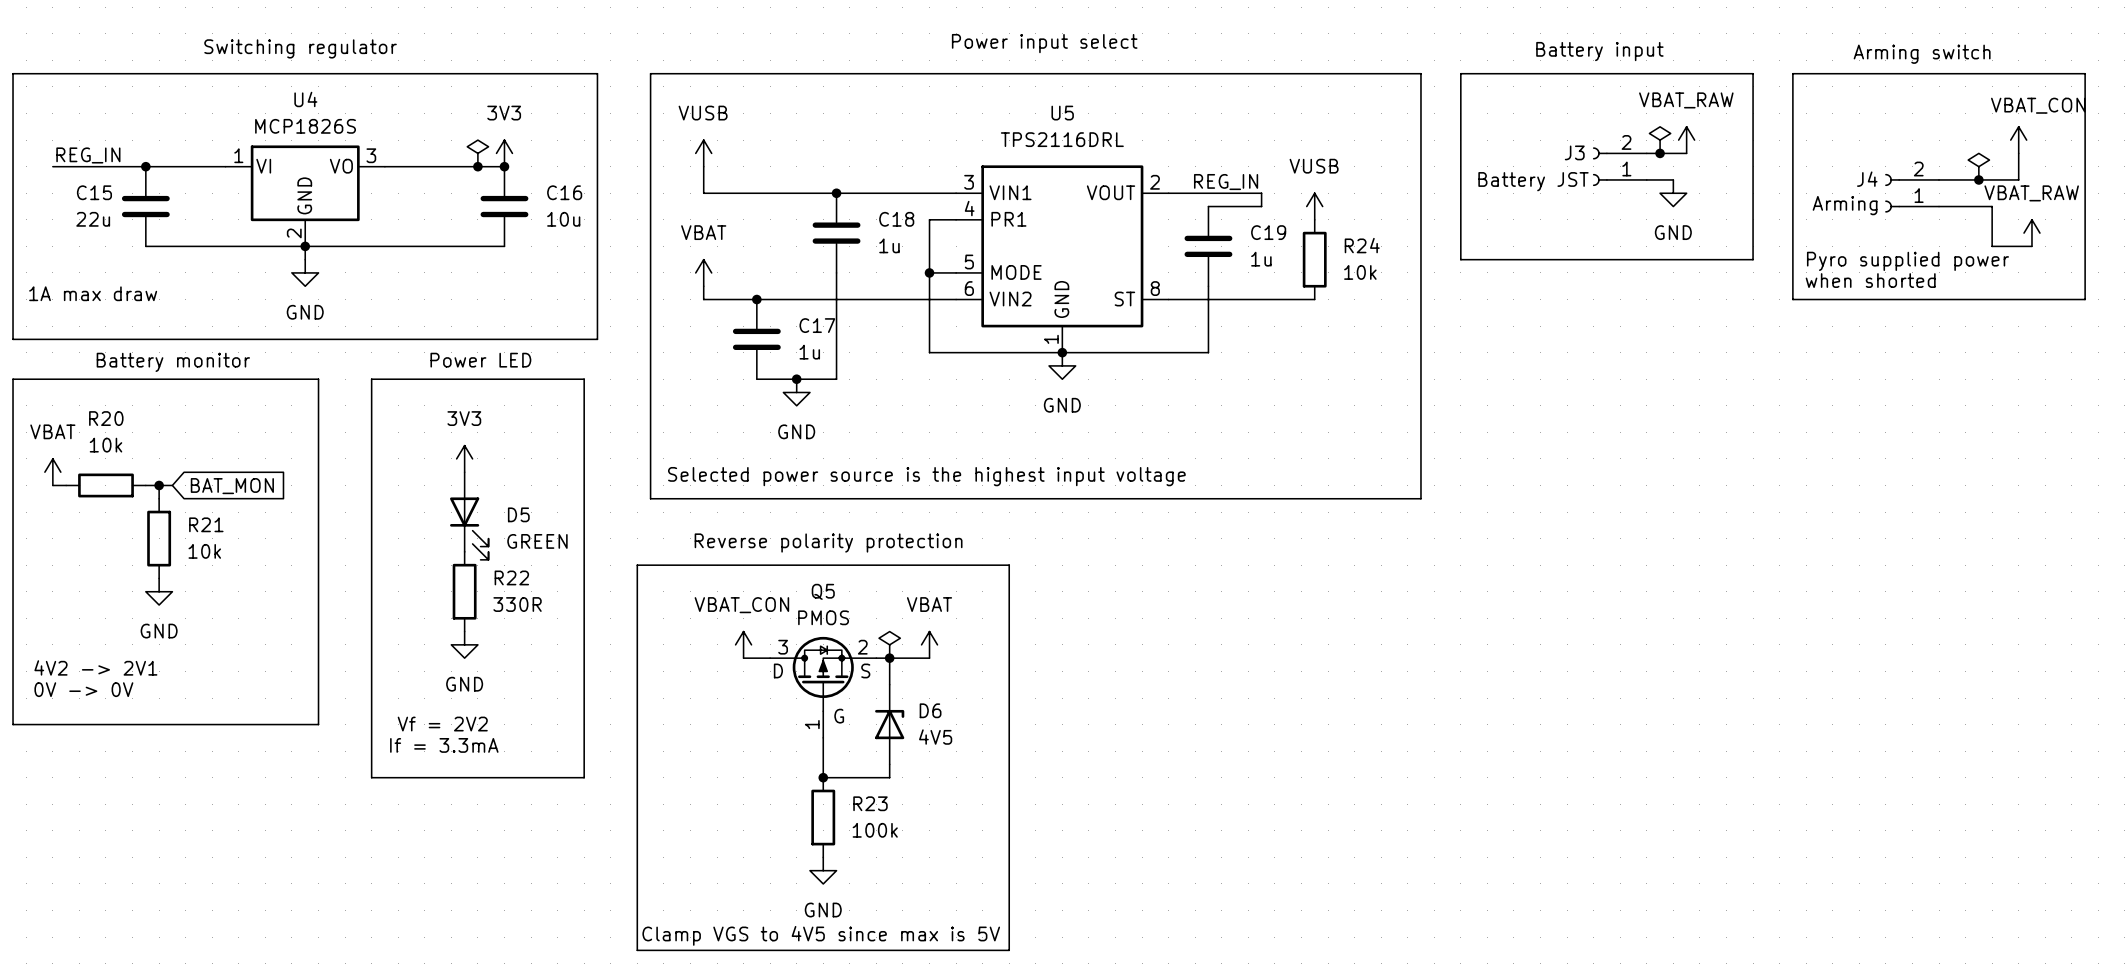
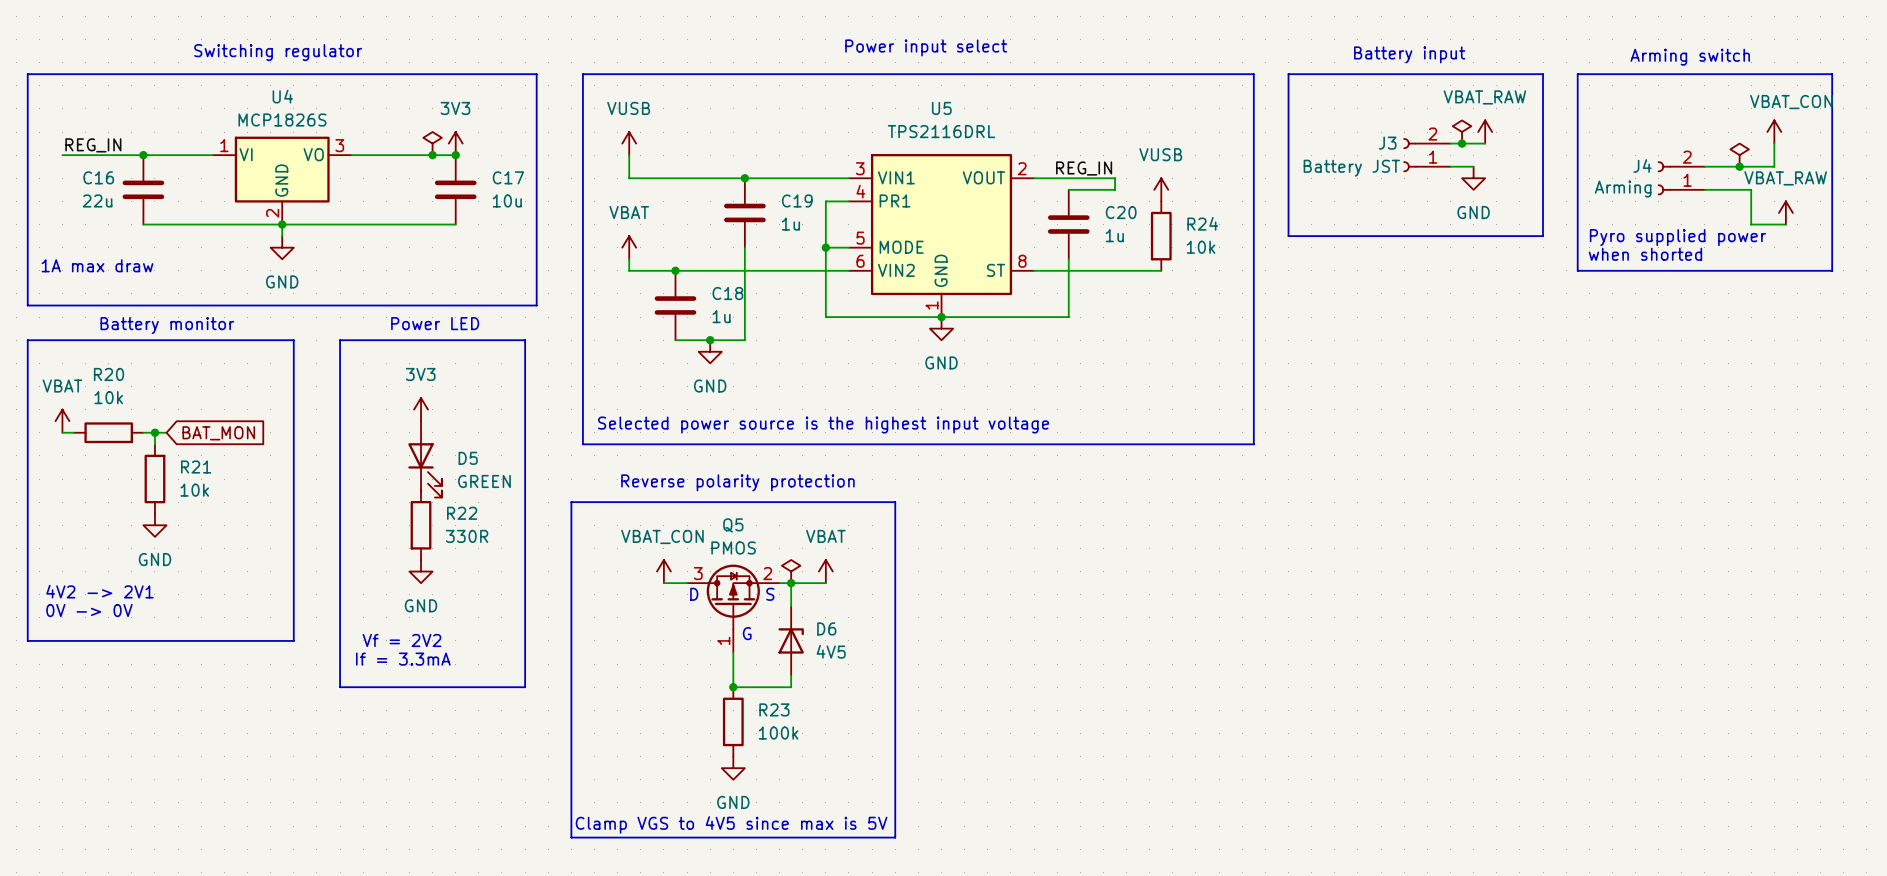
C15 name: C15 (94, 192) -> C16 (98, 177)
C16 name: C16 (564, 192) -> C17 (508, 177)
C18 name: C18 (896, 219) -> C19 (797, 200)
C19 name: C19 (1268, 232) -> C20 (1121, 212)
C17 name: C17 (817, 325) -> C18 (727, 293)

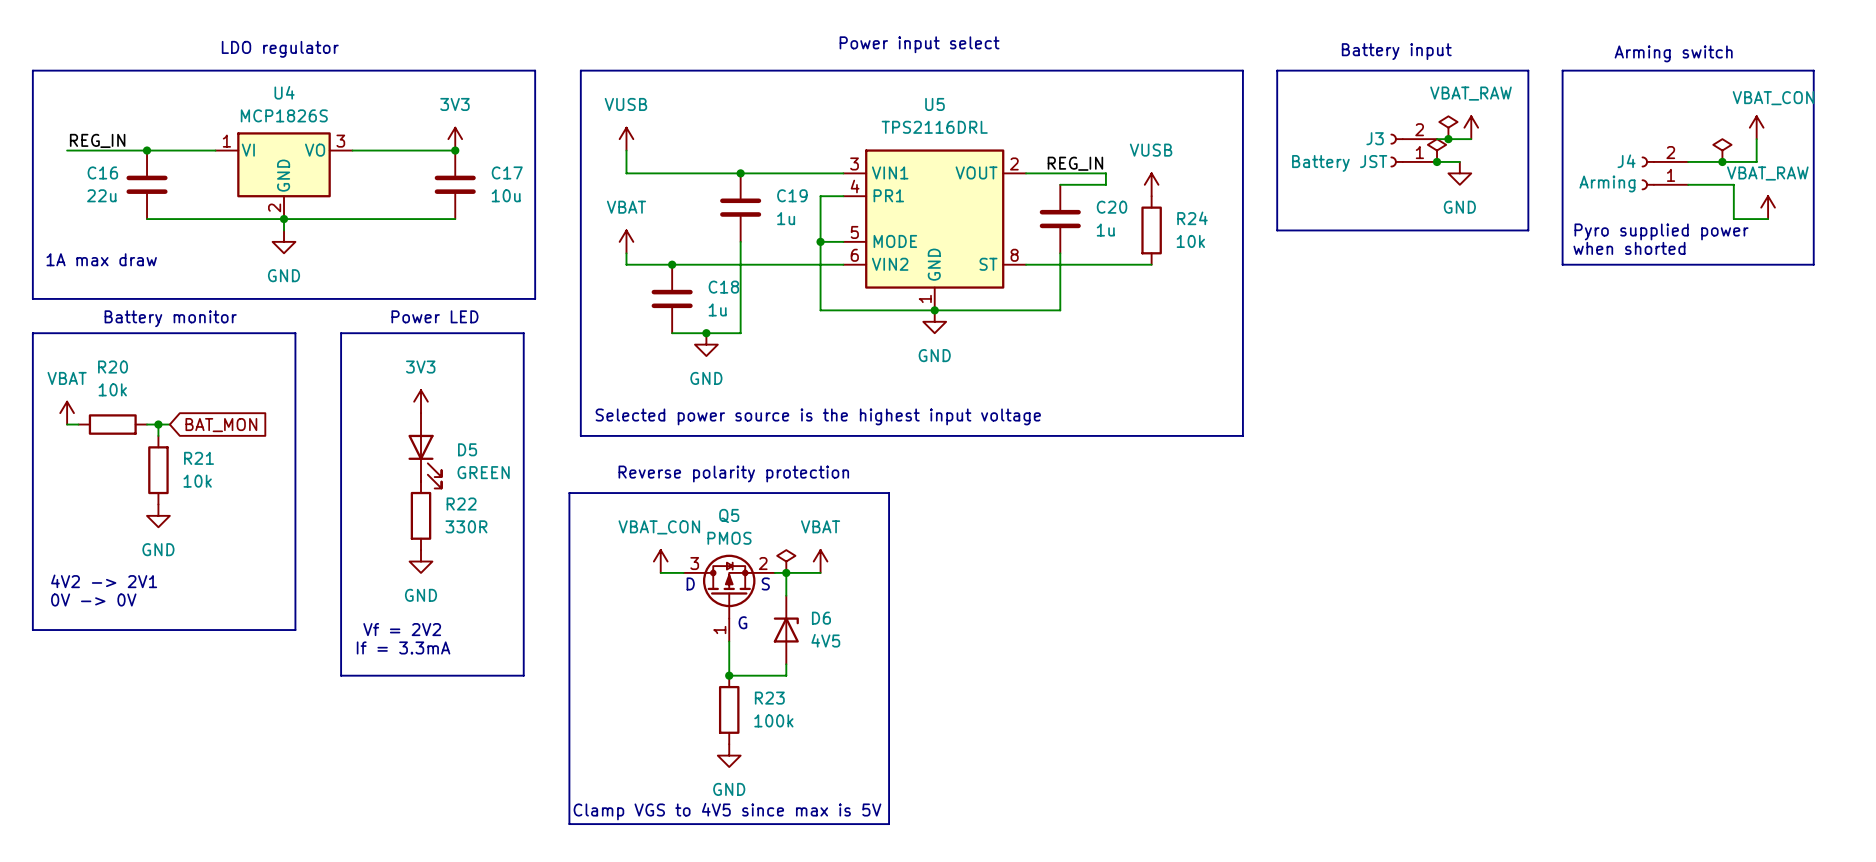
text: Switching regulator (278, 52) -> LDO regulator (280, 49)
power symbol: (432, 143) -> none
junction: (432, 155) -> none
power symbol: none -> (1437, 150)
junction: none -> (1437, 161)

